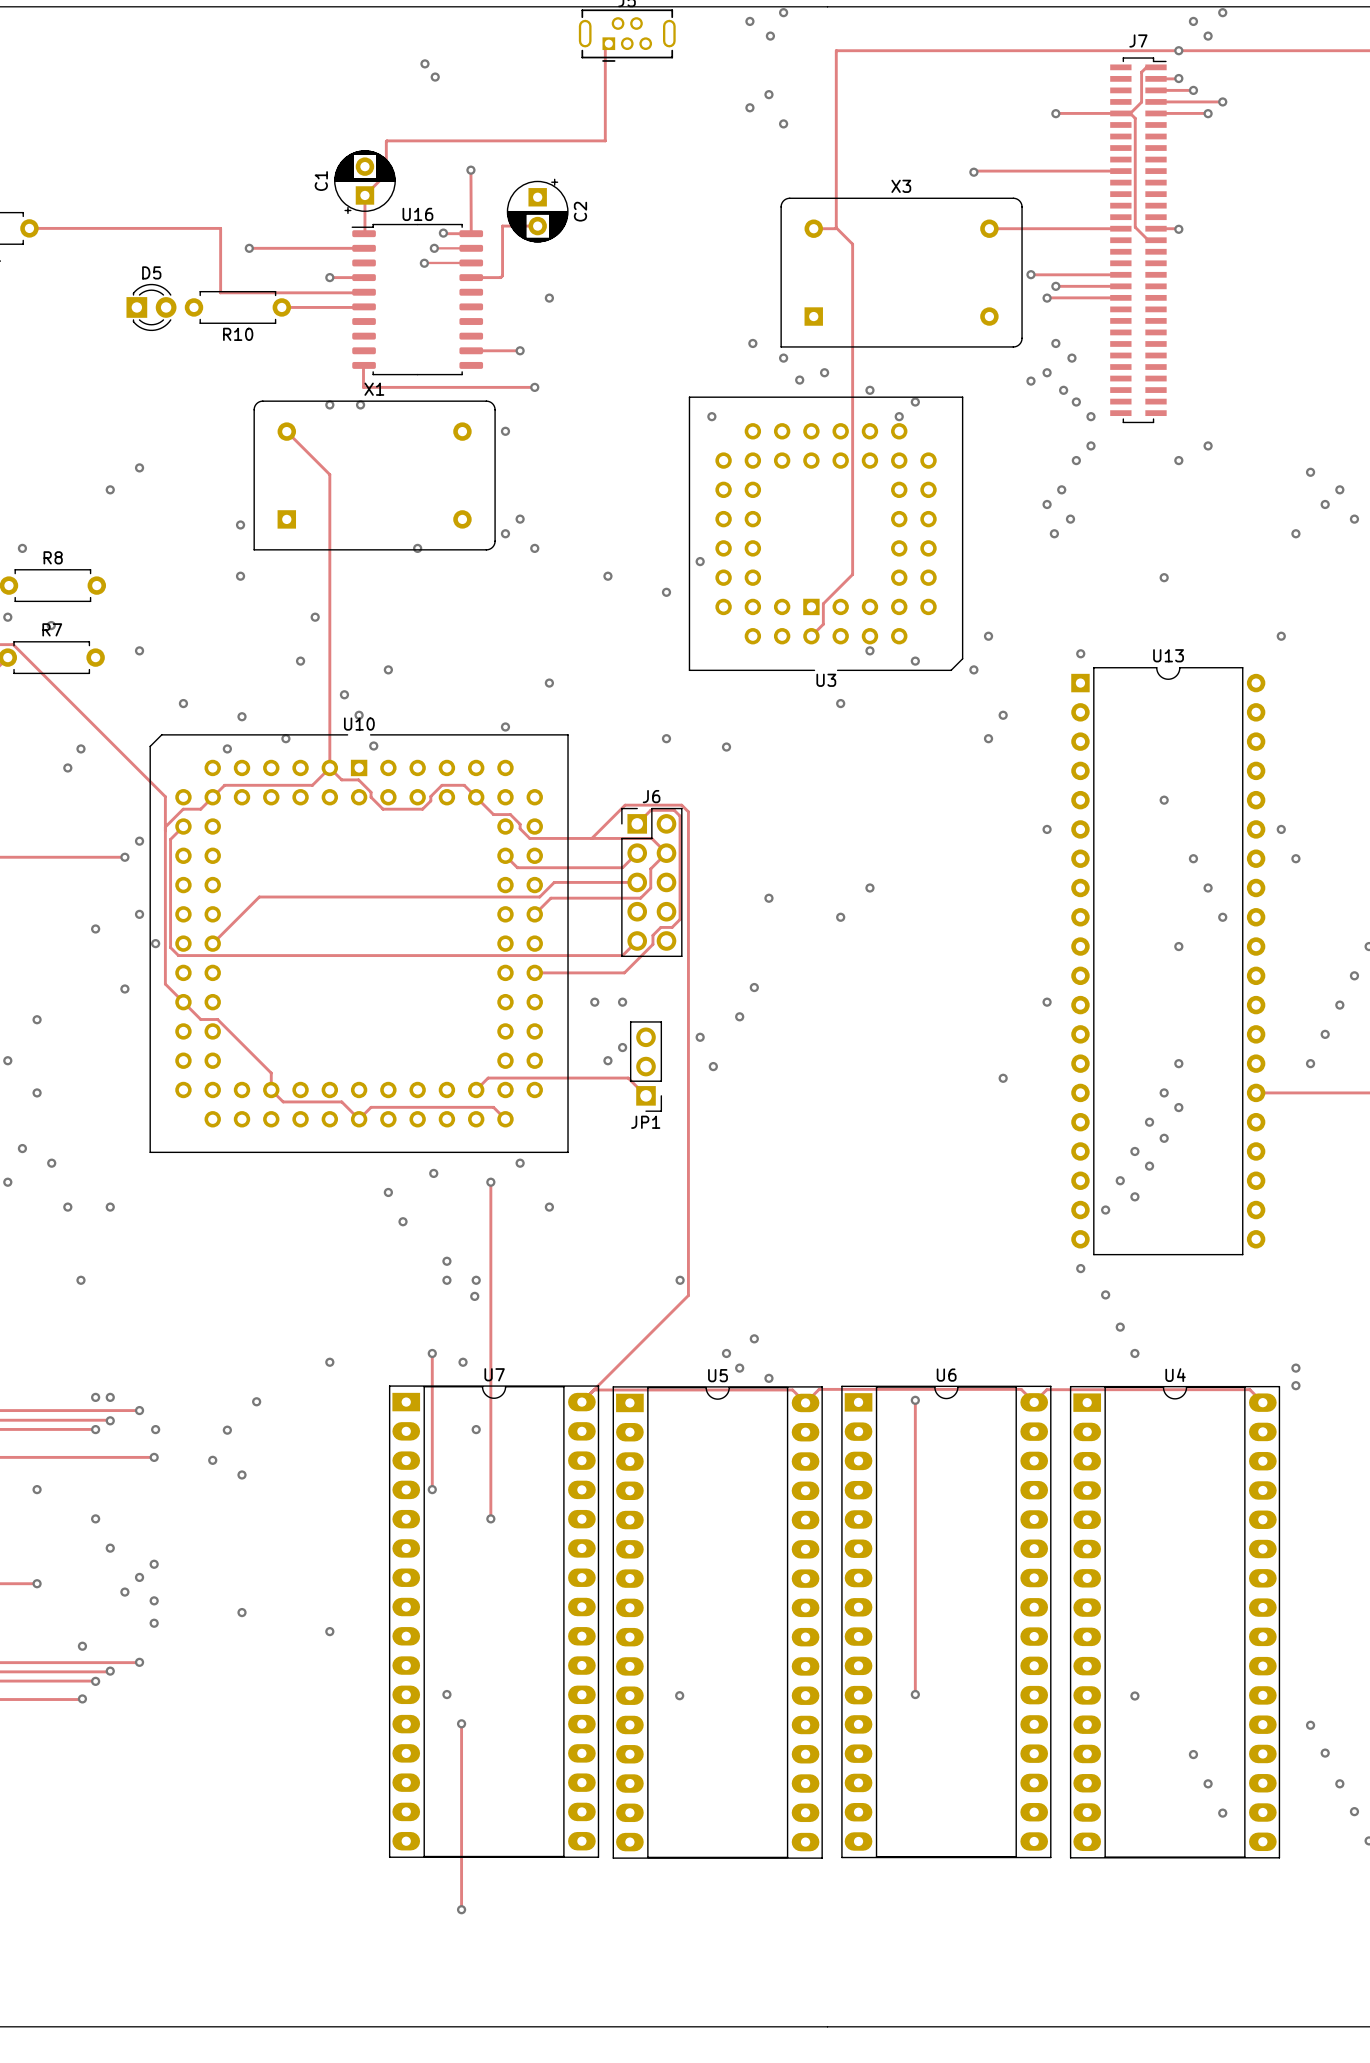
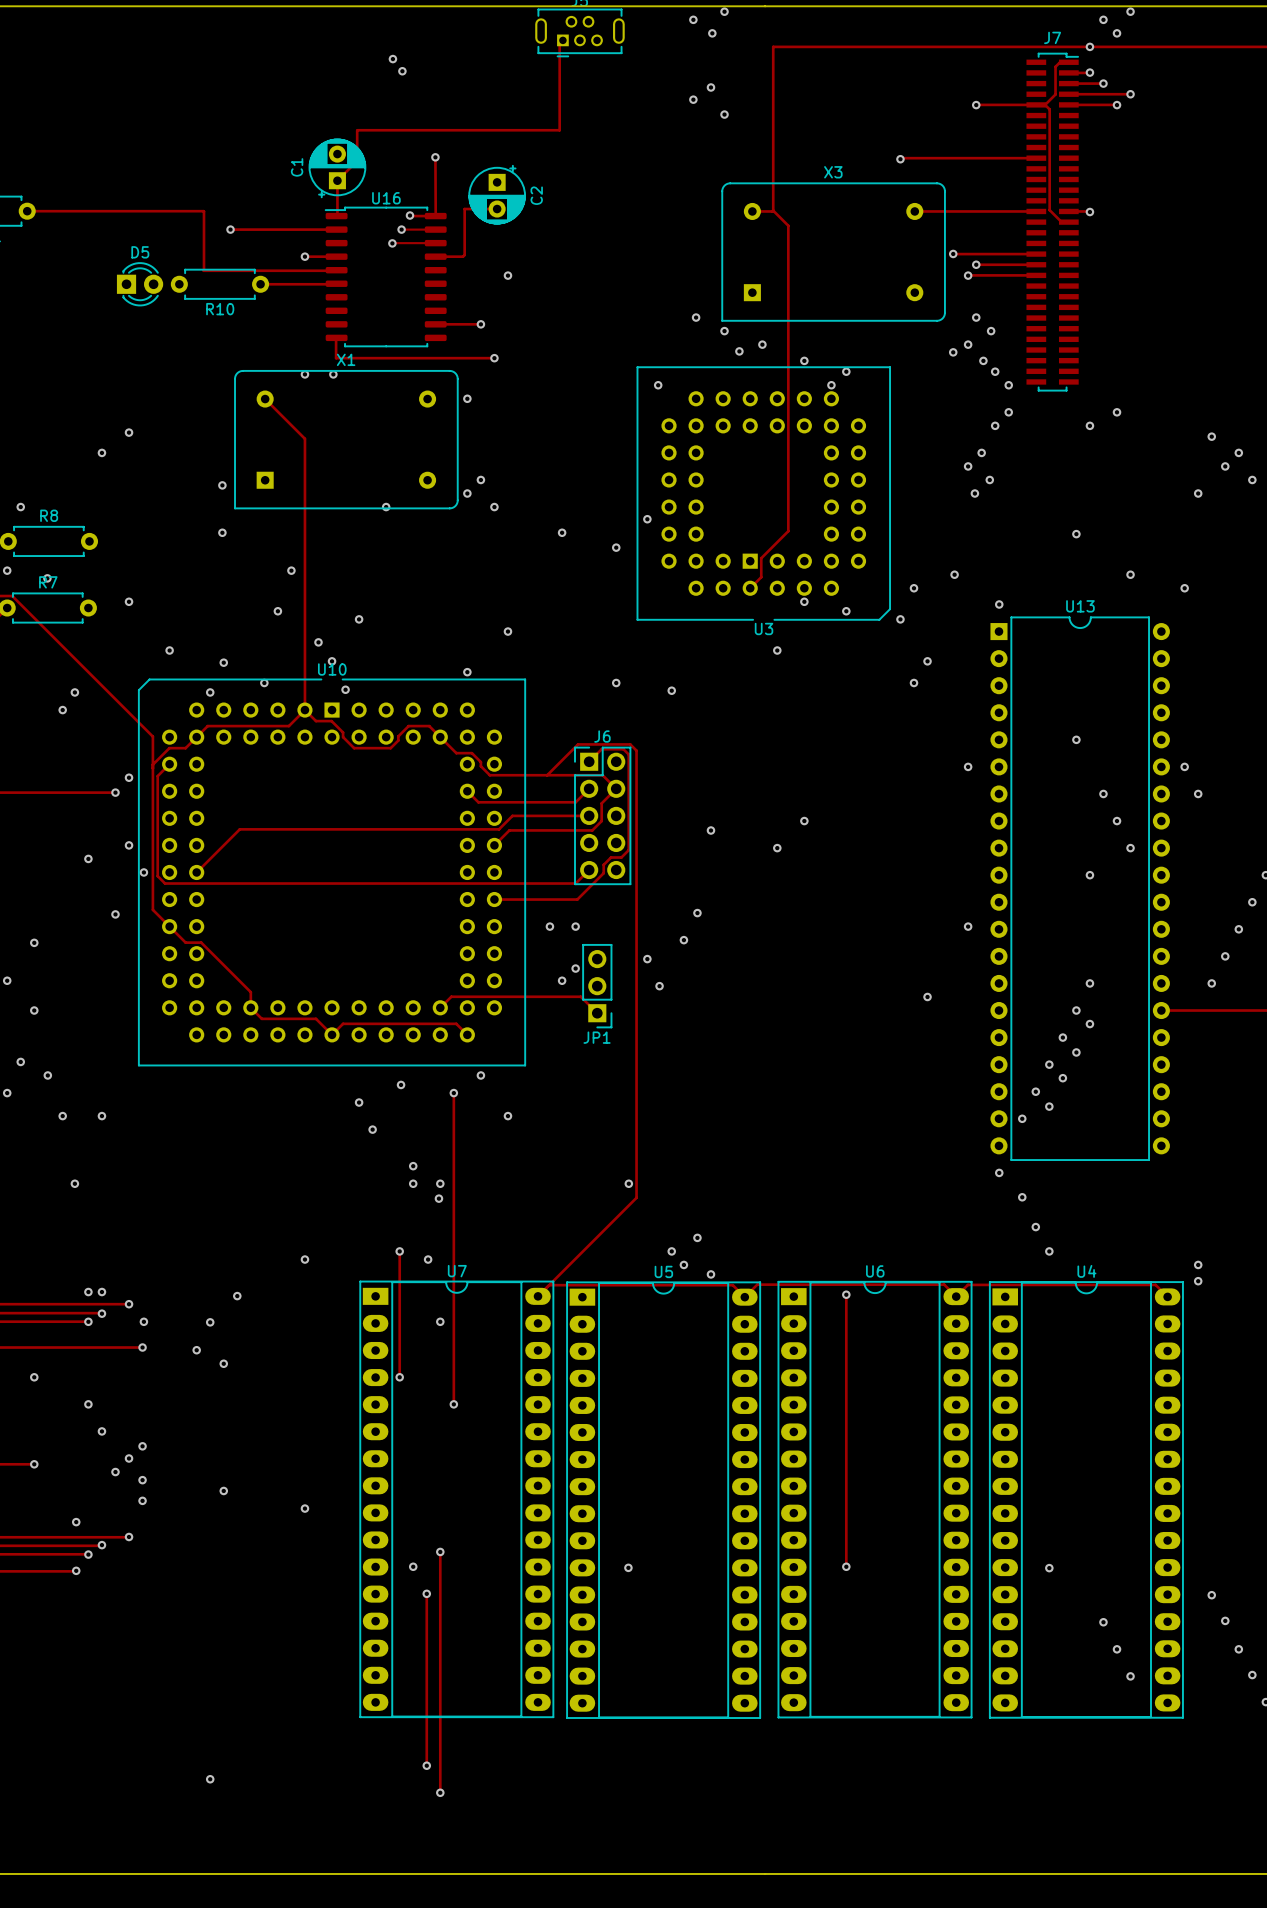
via: none -> (954, 574)
via: none -> (1130, 574)
track: none -> (440, 1551) (440, 1792)
via: none -> (440, 1551)
via: none -> (210, 1779)
via: none -> (440, 1792)

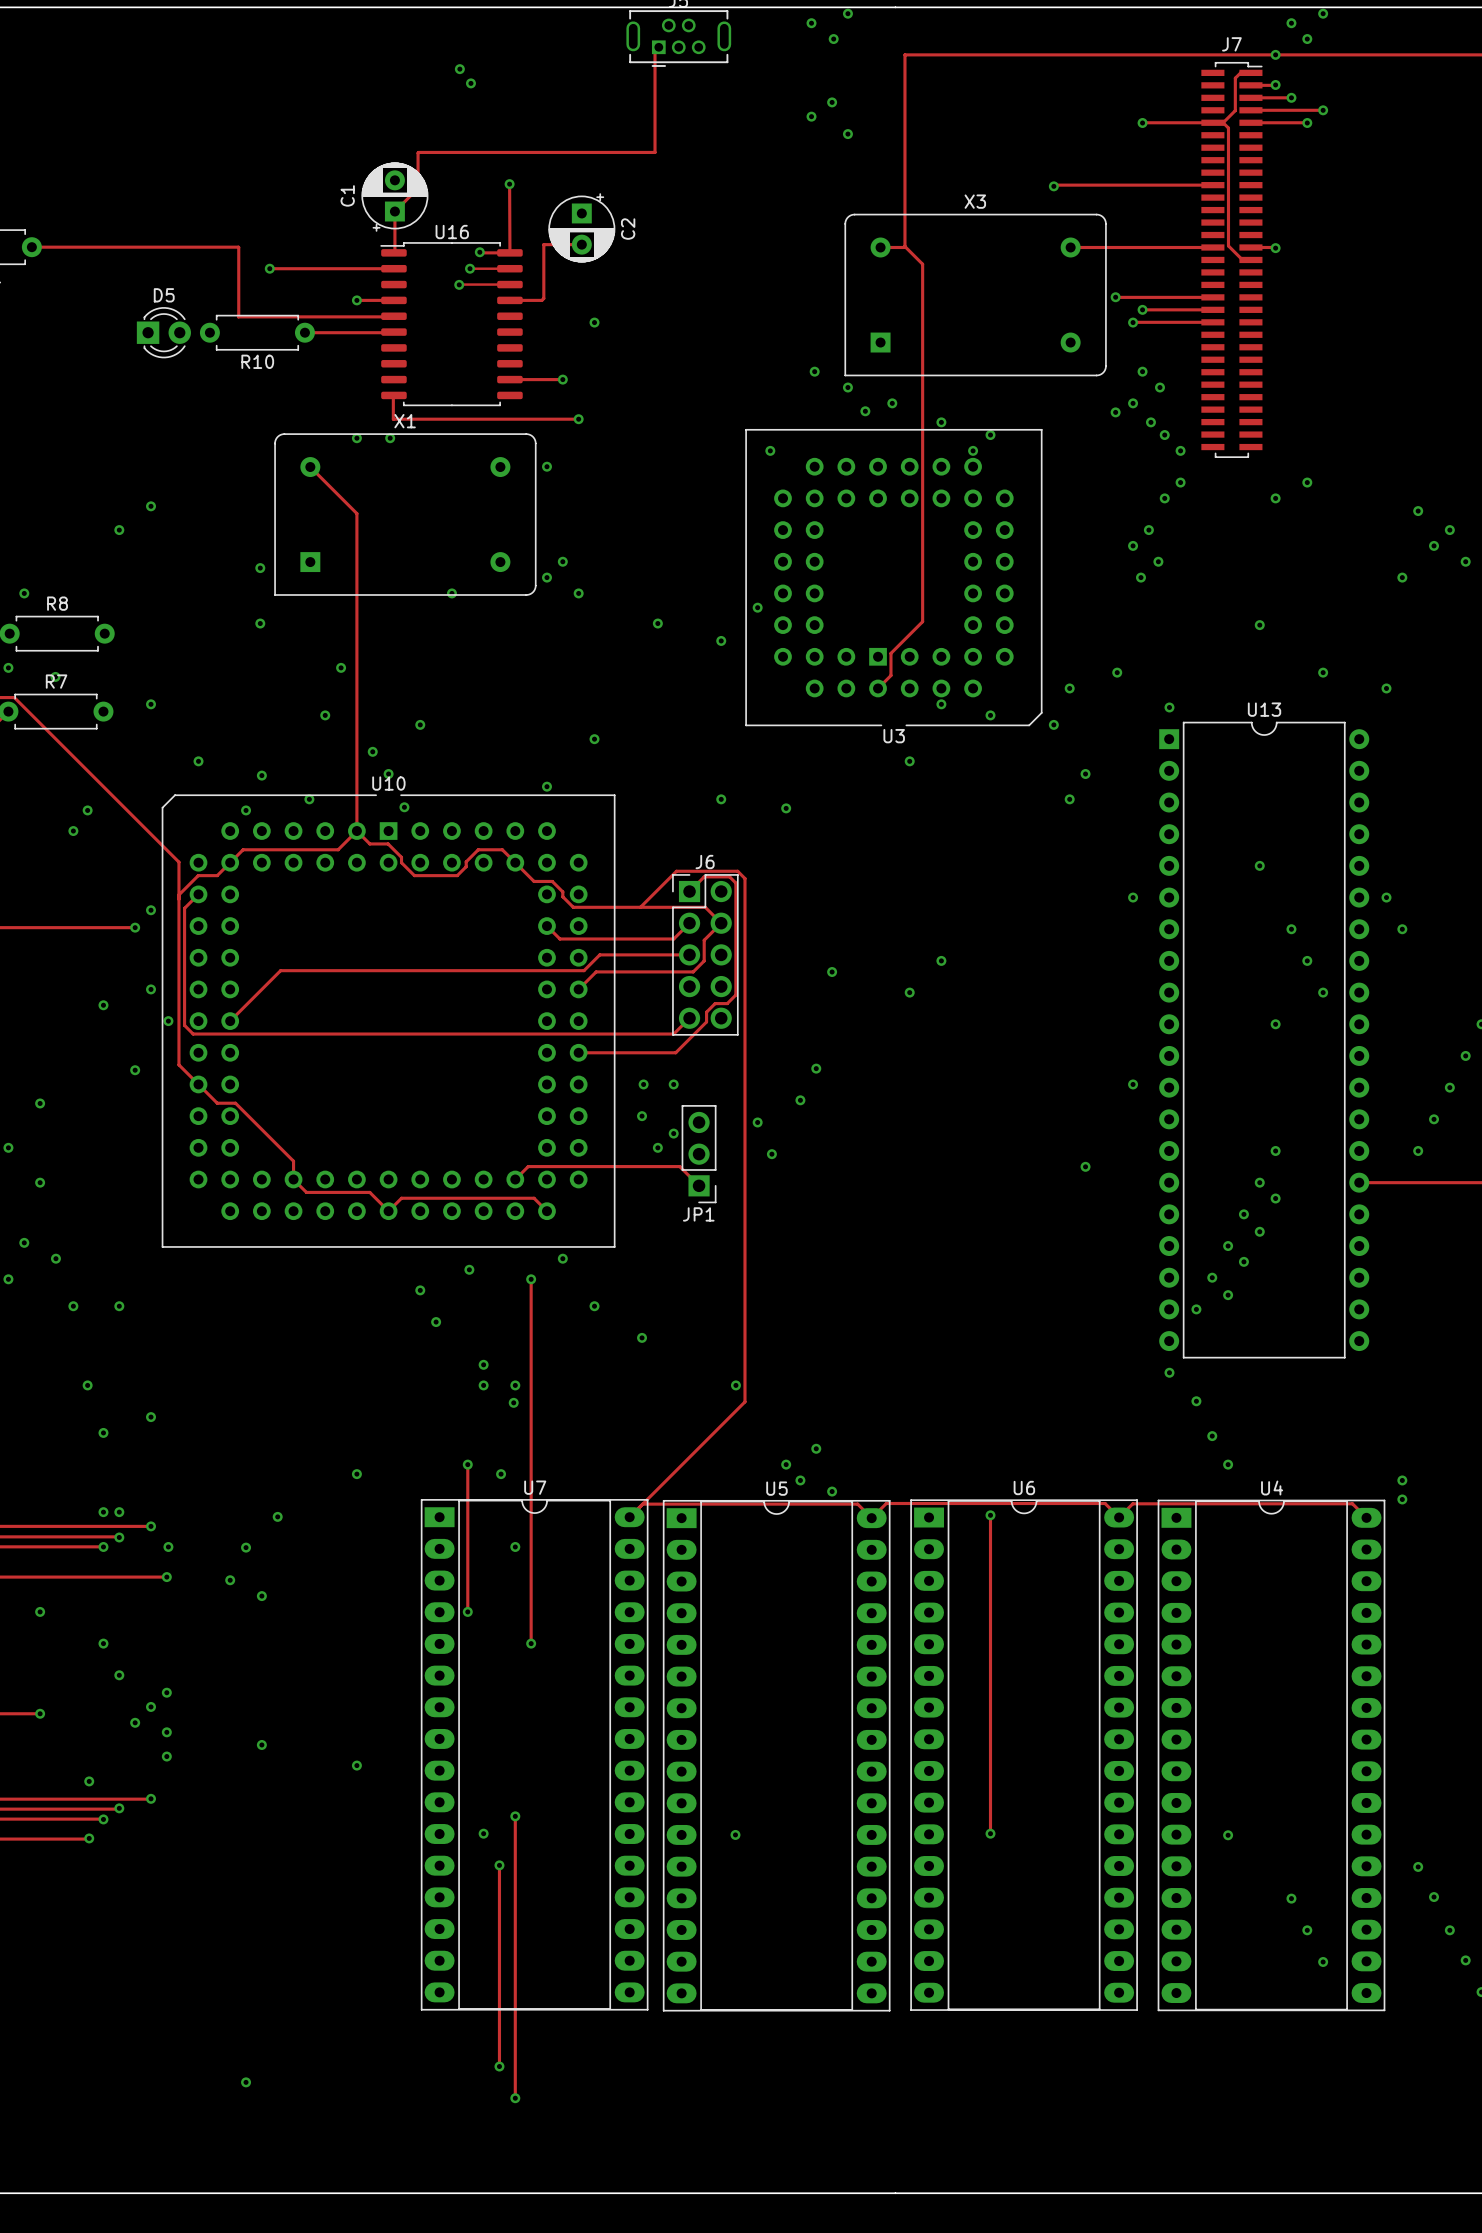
via: none -> (642, 1116)
via: none -> (642, 1337)
via: none -> (150, 1417)
via: none -> (103, 1432)

